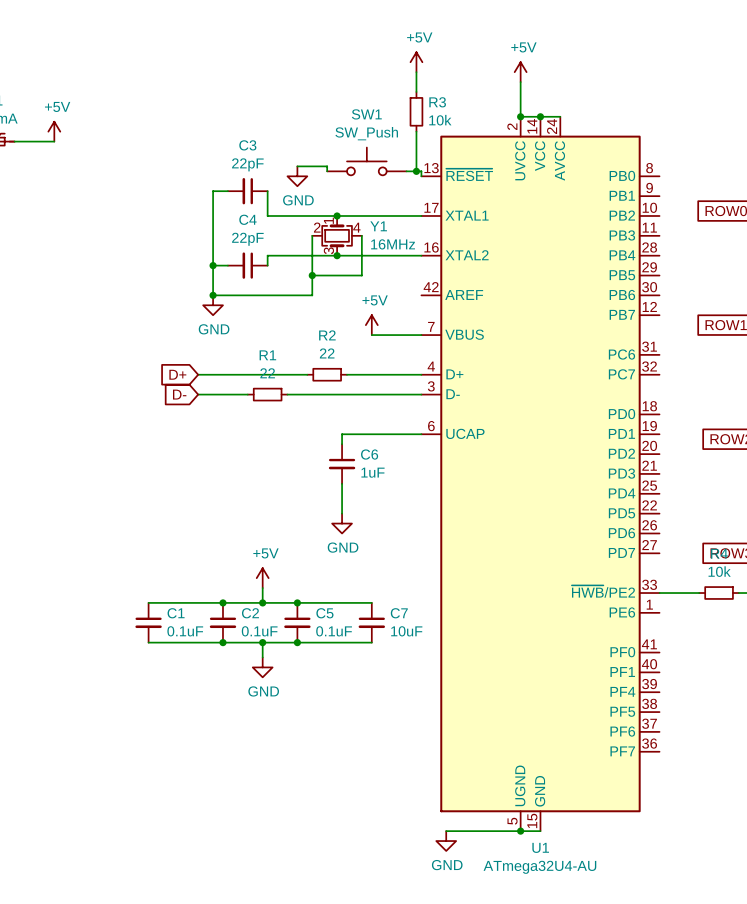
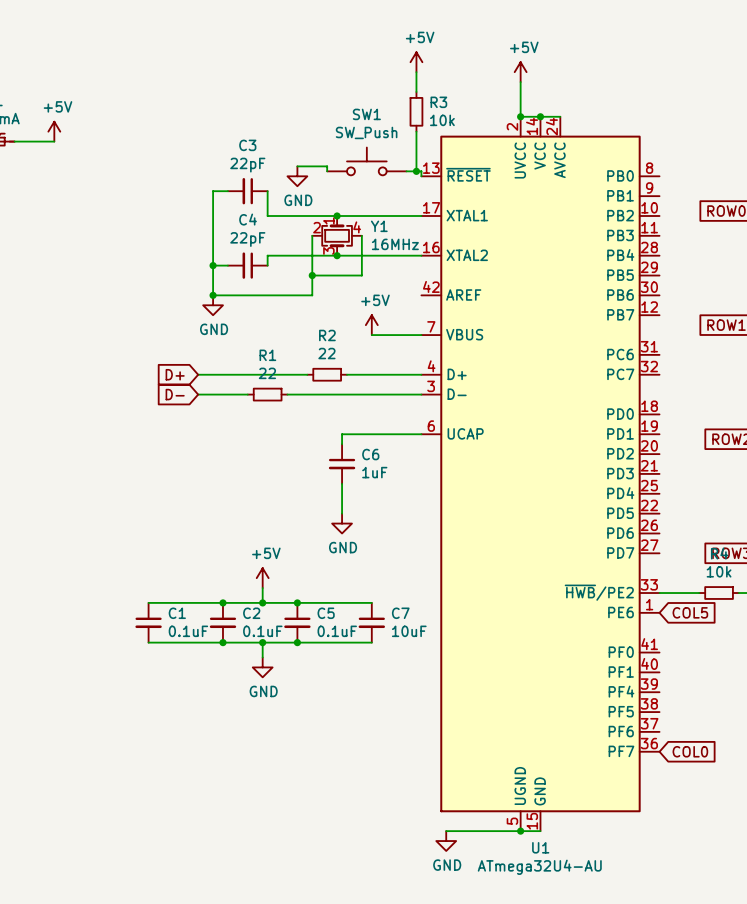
global label: none -> COL5 (690, 612)
global label: none -> COL0 (690, 751)

